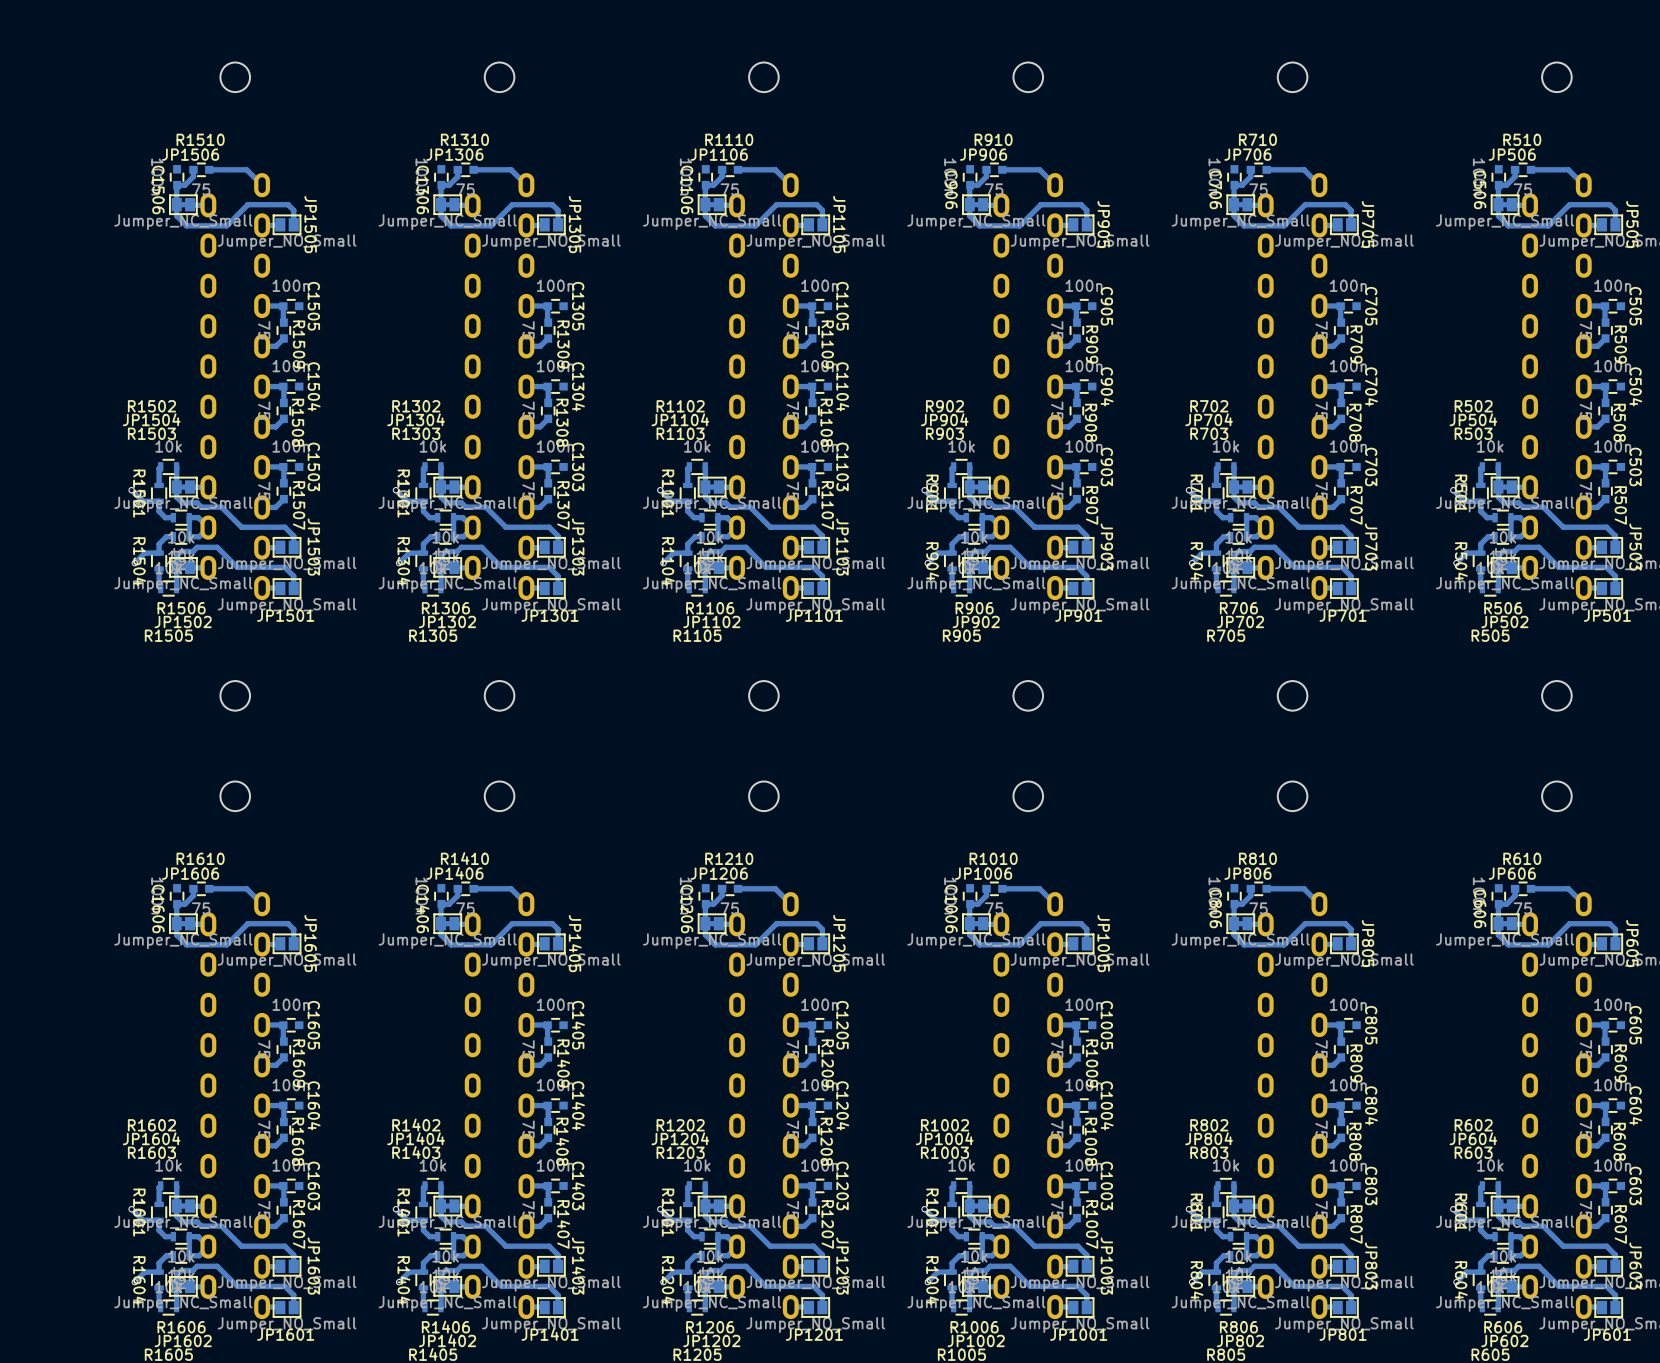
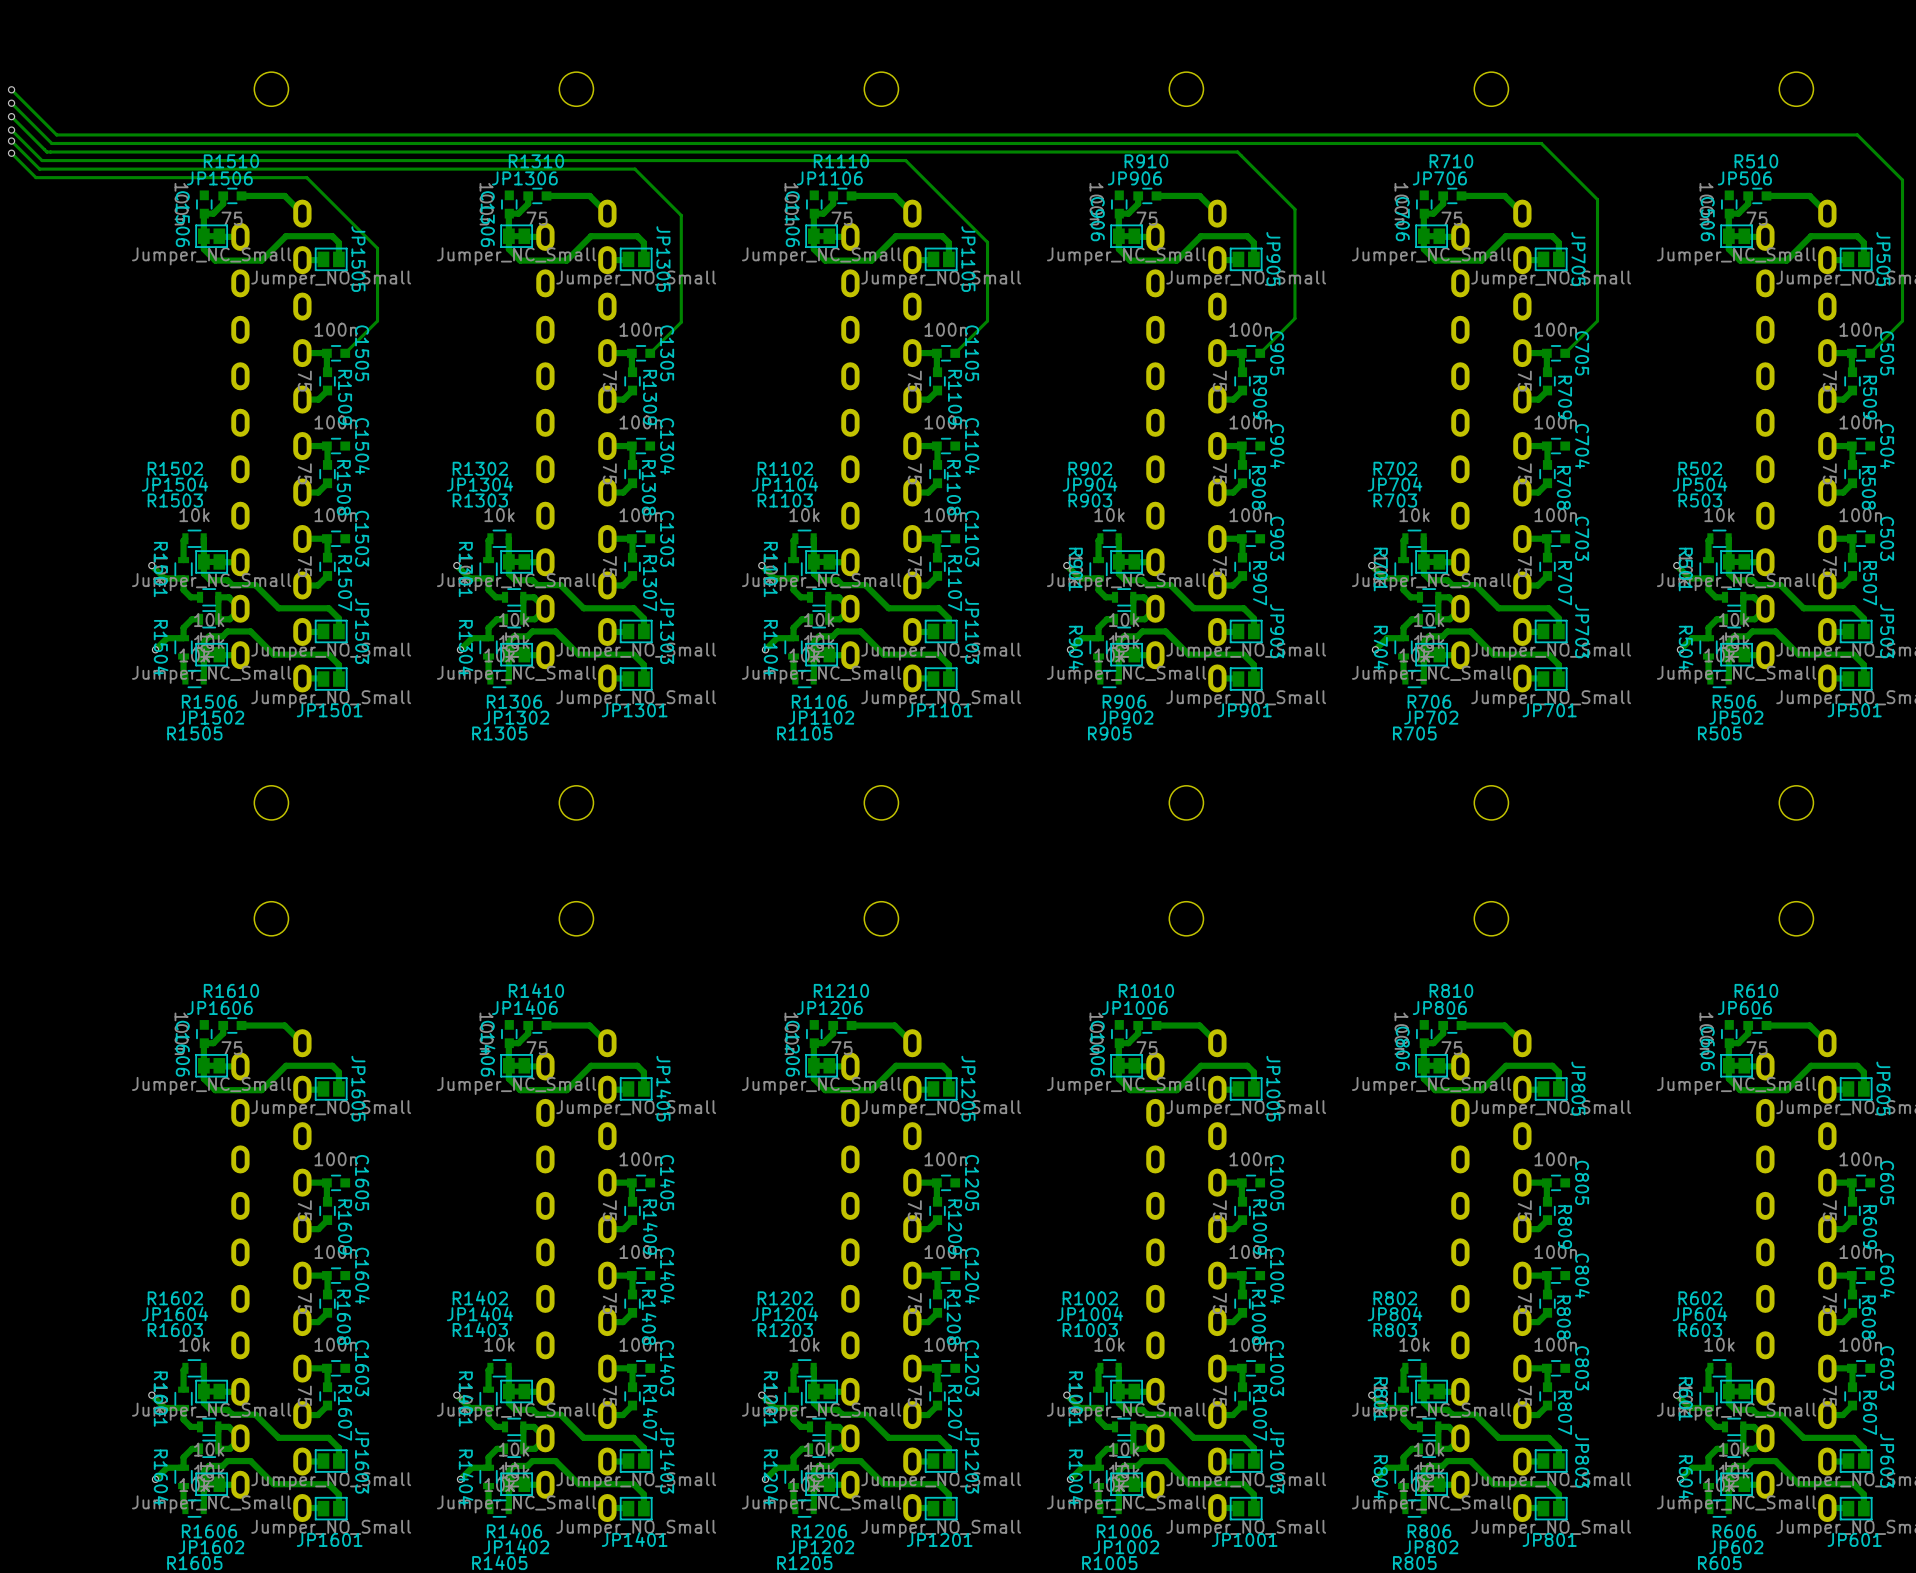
track: none -> (11, 89) (56, 134) (1857, 134) (1902, 180) (1902, 320) (1870, 353)
via: none -> (11, 89)
track: none -> (11, 103) (51, 143) (1541, 143) (1597, 199) (1597, 320) (1565, 353)
via: none -> (11, 103)
track: none -> (11, 116) (46, 152) (1237, 152) (1294, 209) (1294, 318) (1260, 353)
via: none -> (11, 116)
track: none -> (11, 130) (42, 160) (905, 160) (987, 242) (987, 320) (955, 353)
via: none -> (11, 130)
track: none -> (11, 141) (39, 169) (634, 169) (681, 215) (681, 322) (650, 353)
via: none -> (11, 141)
track: none -> (11, 153) (35, 177) (306, 177) (377, 248) (377, 320) (345, 353)
via: none -> (11, 153)

